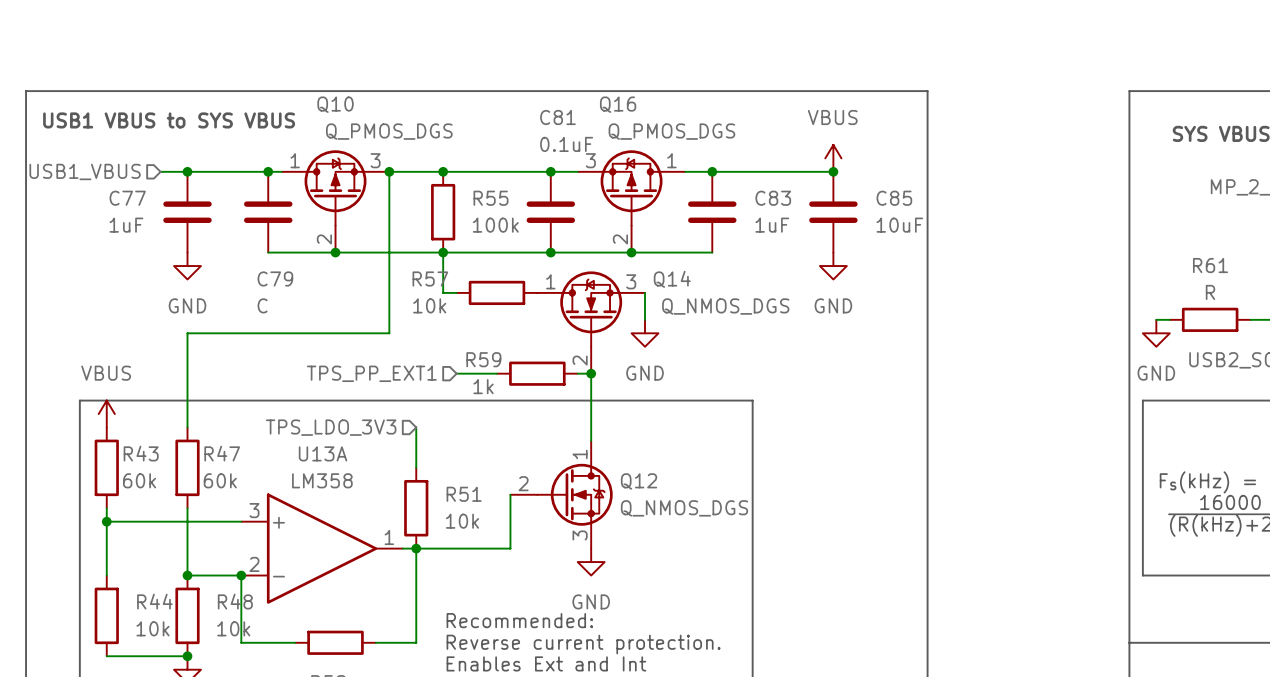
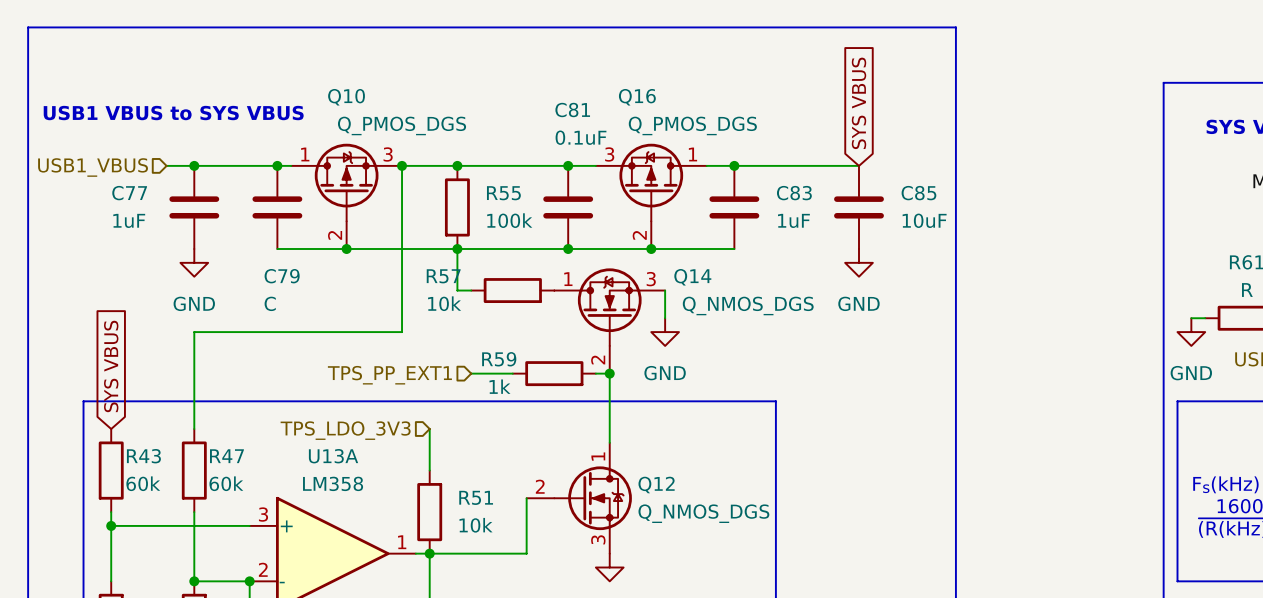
line: (26, 91) (927, 91) -> (28, 82) (28, 27) (955, 27) (955, 82)
global label: none -> SYS VBUS (859, 103)
power symbol: VBUS (833, 158) -> none
junction: (833, 171) -> none
global label: none -> SYS VBUS (111, 366)
power symbol: VBUS (106, 414) -> none

